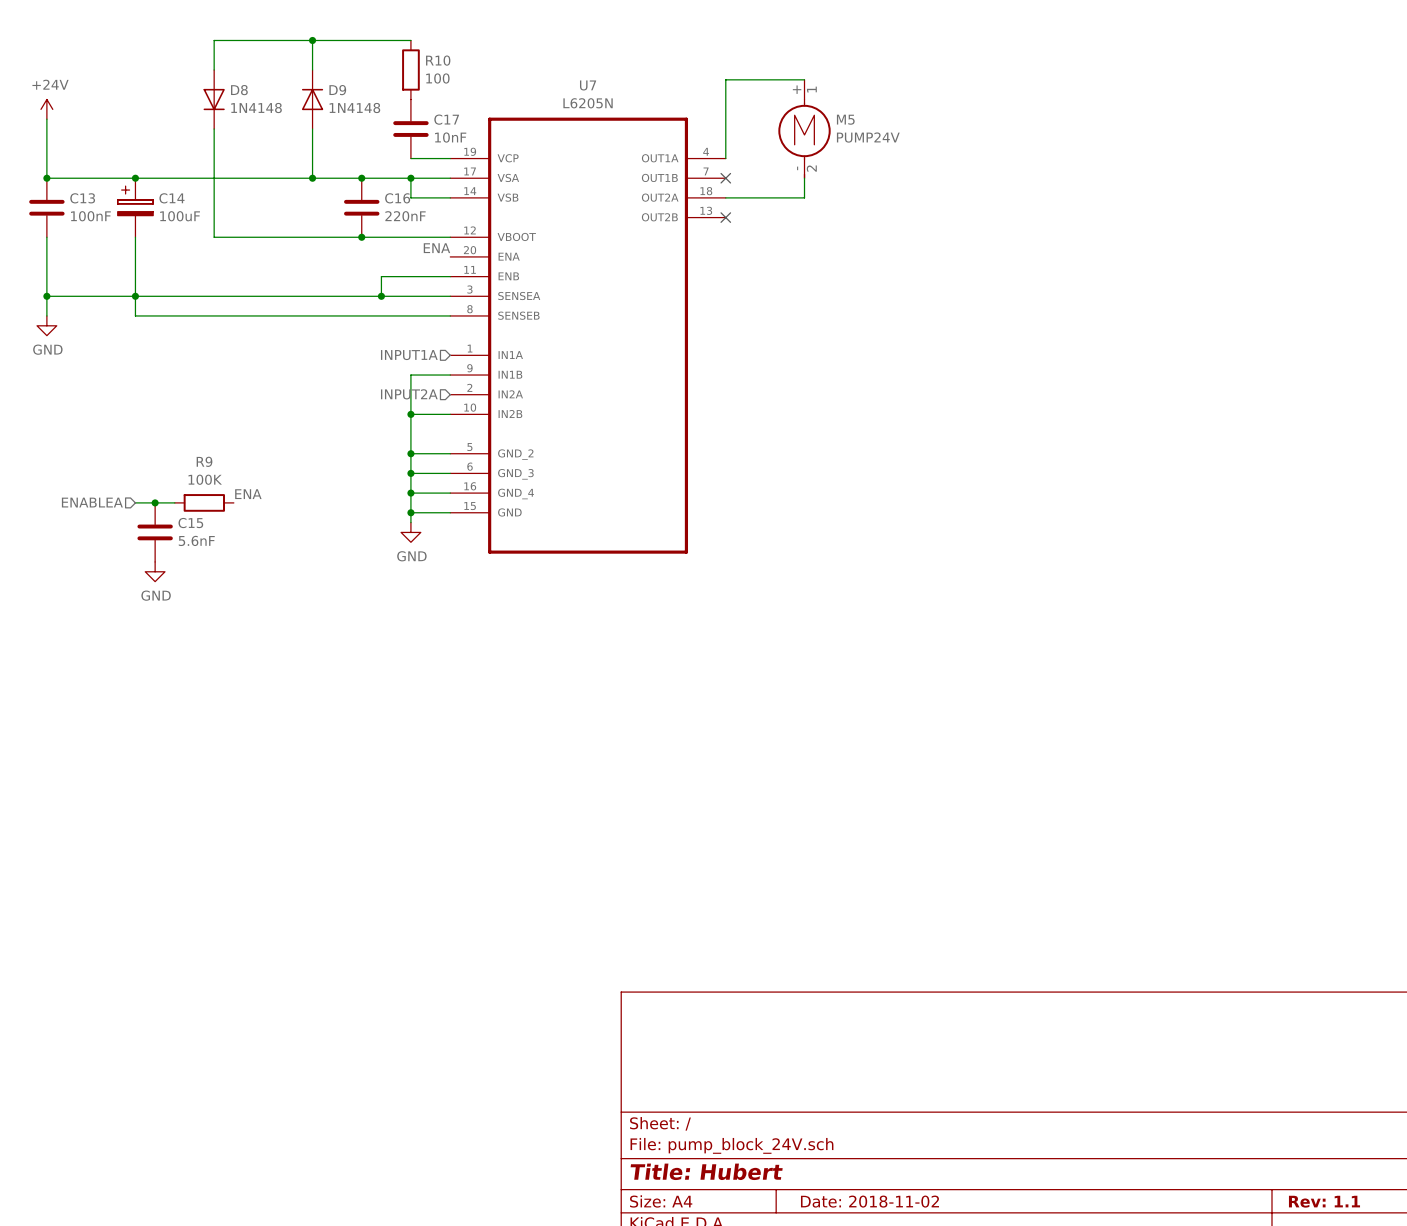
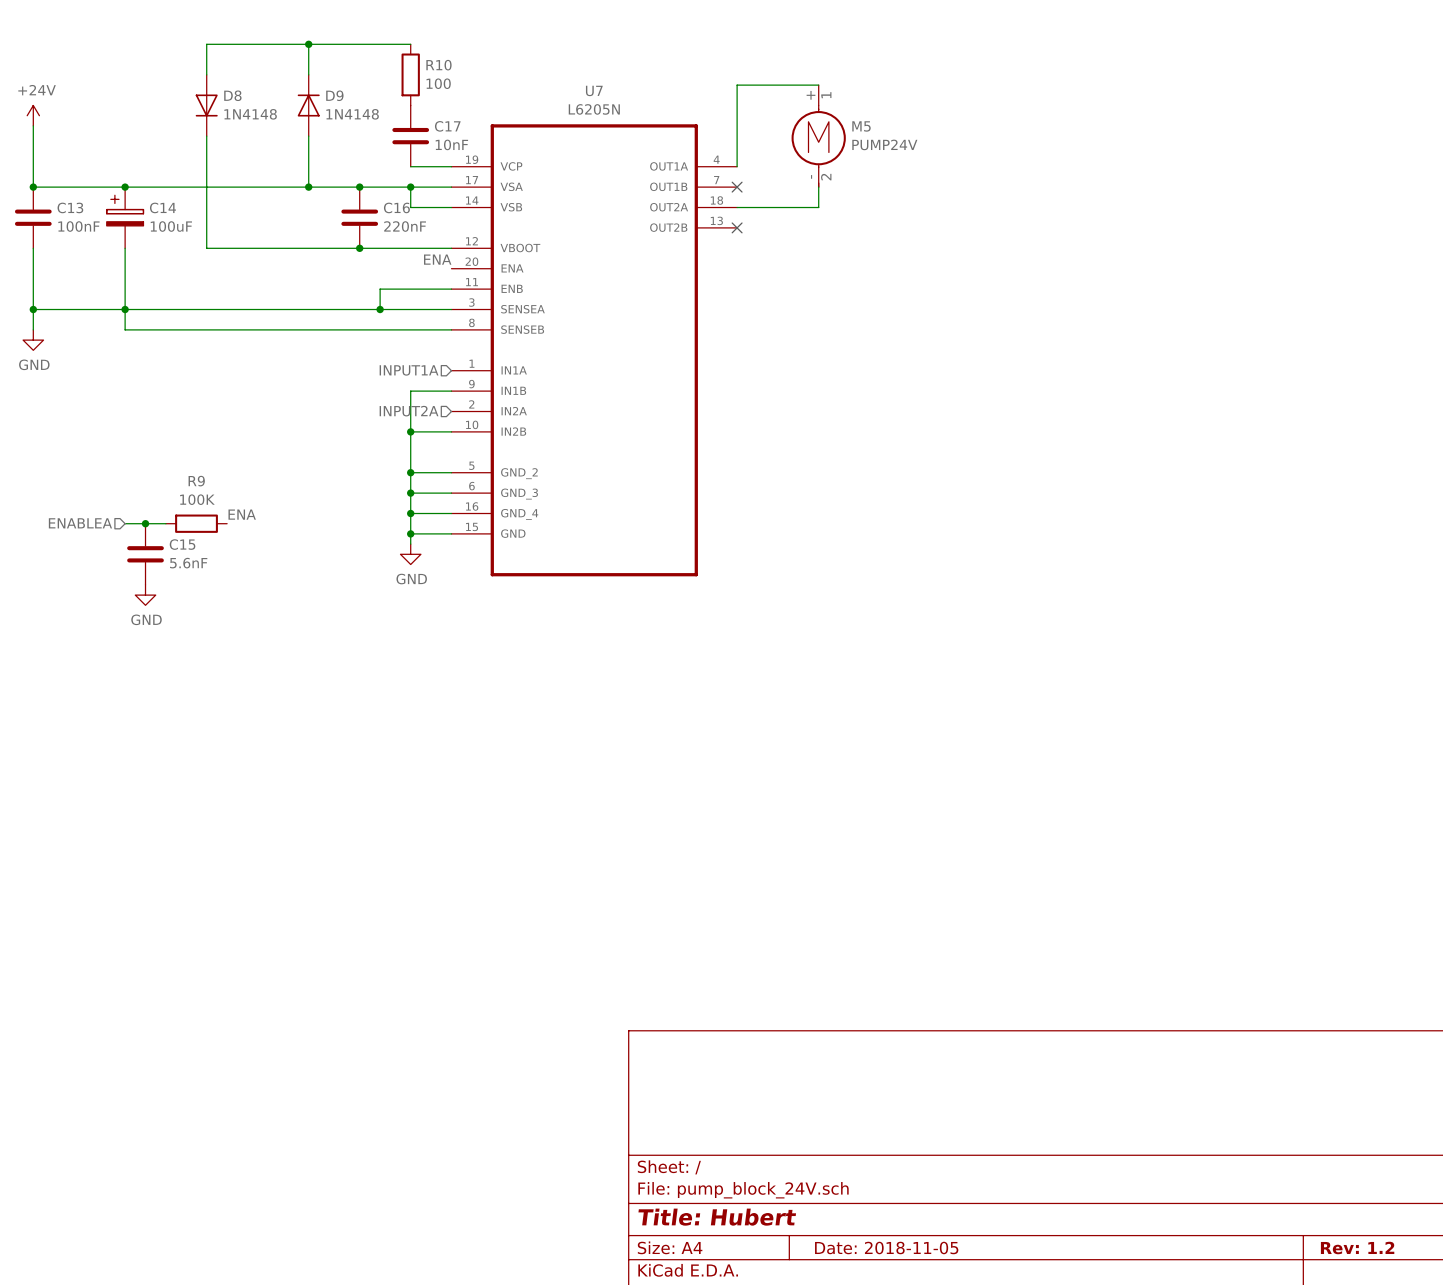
title block: Date: 2018-11-02 (869, 1201) -> Date: 2018-11-05 (886, 1247)
title block: Rev: 1.1 (1324, 1201) -> Rev: 1.2 (1357, 1247)

